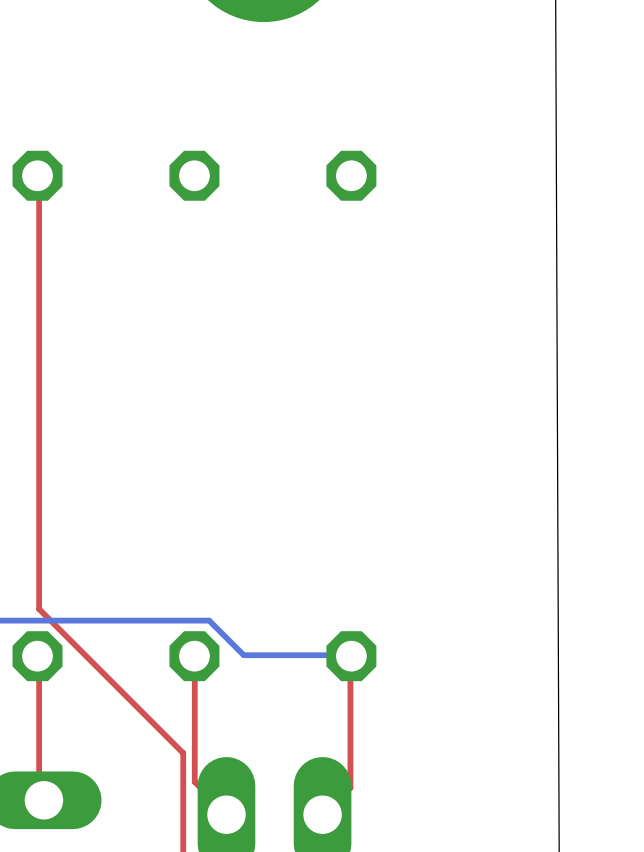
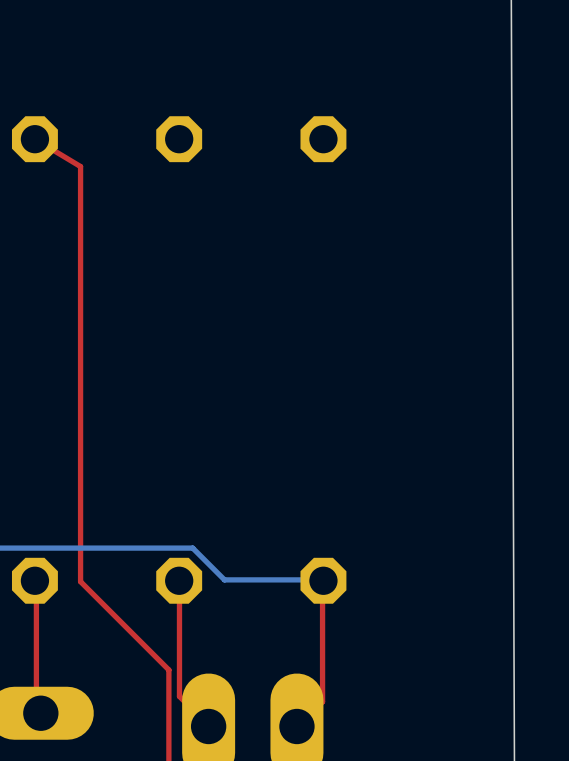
top track: (39, 176) (39, 609) (87, 657) -> (36, 140) (80, 166) (80, 581)

